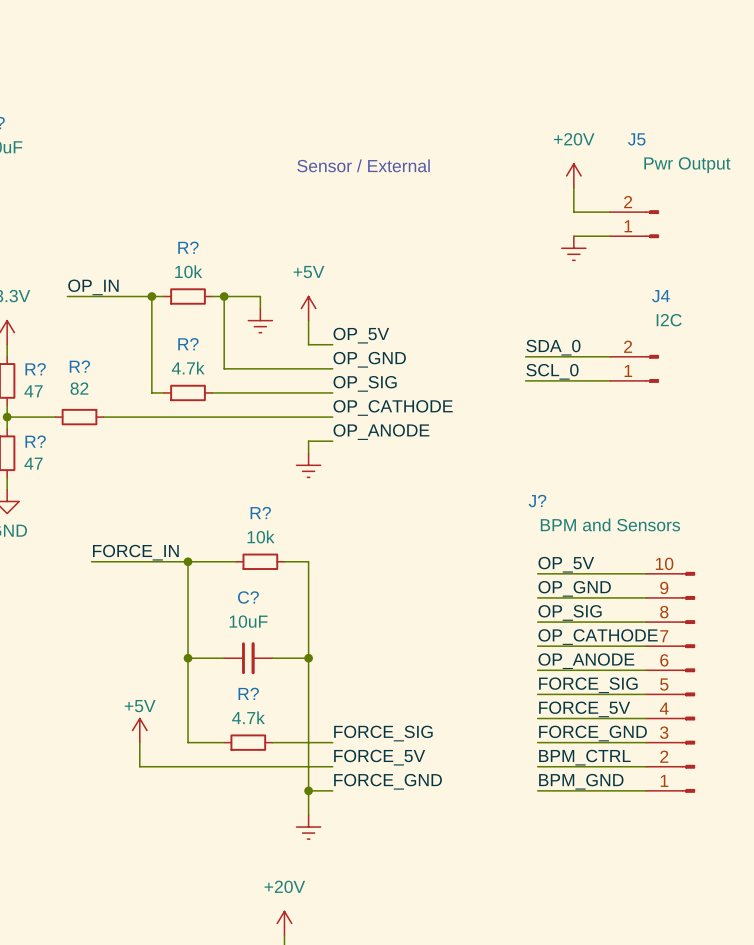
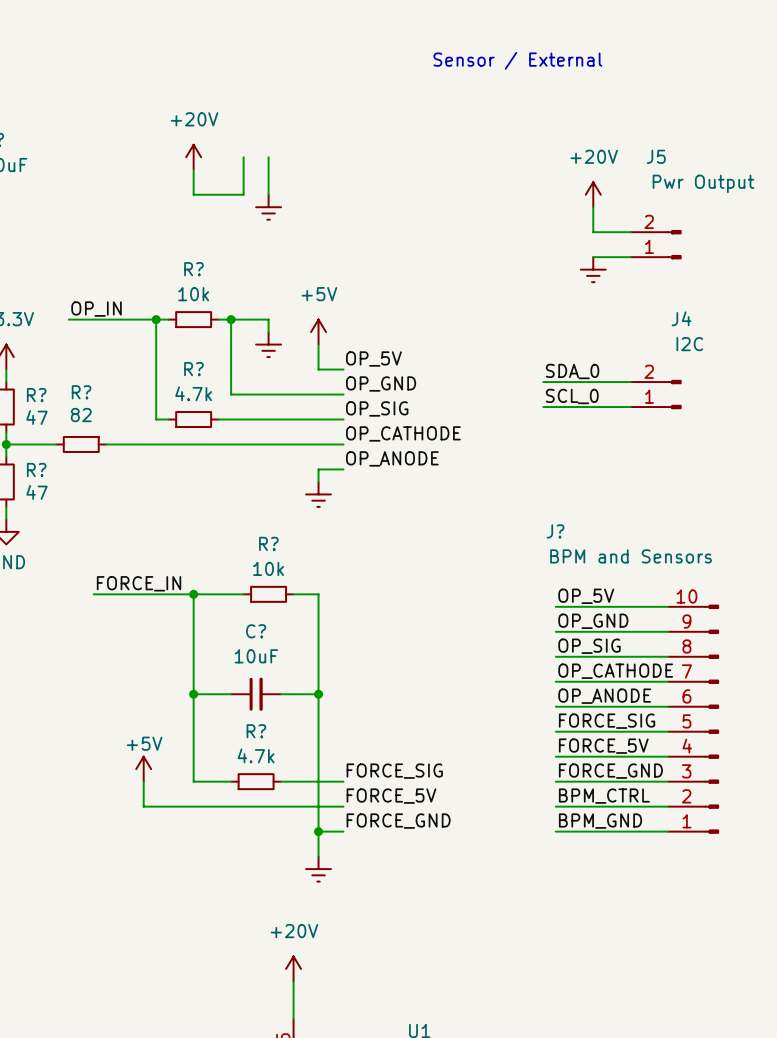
power symbol: none -> +20V (193, 157)
wire: none -> (243, 157) (243, 194) (193, 194) (193, 169)
wire: none -> (268, 157) (268, 194)
text position: Sensor / External (363, 165) -> Sensor / External (517, 60)
power symbol: none -> (268, 207)

